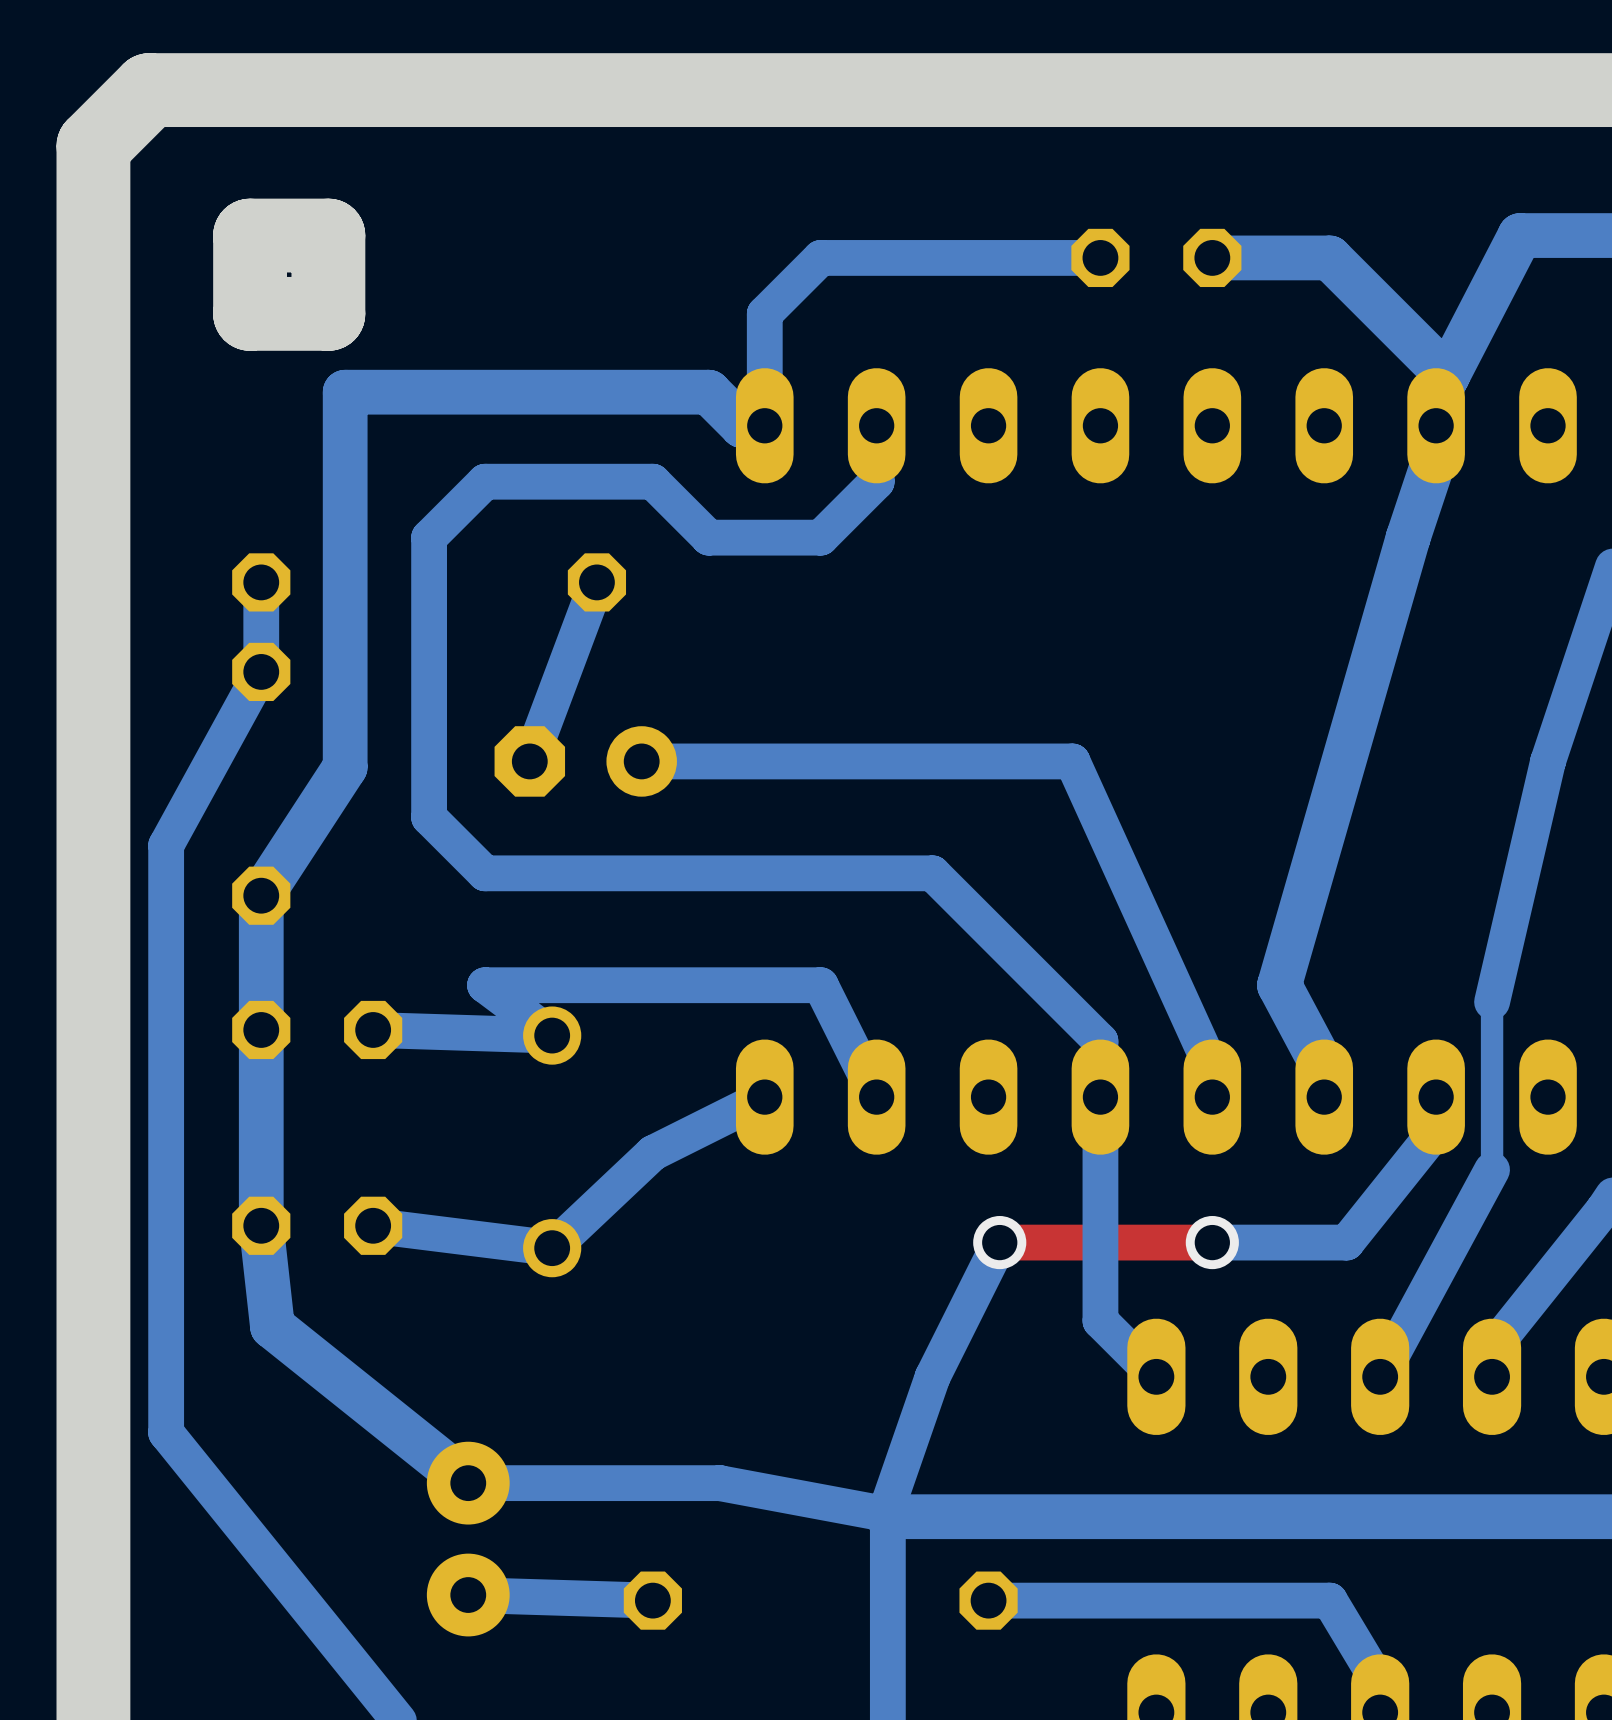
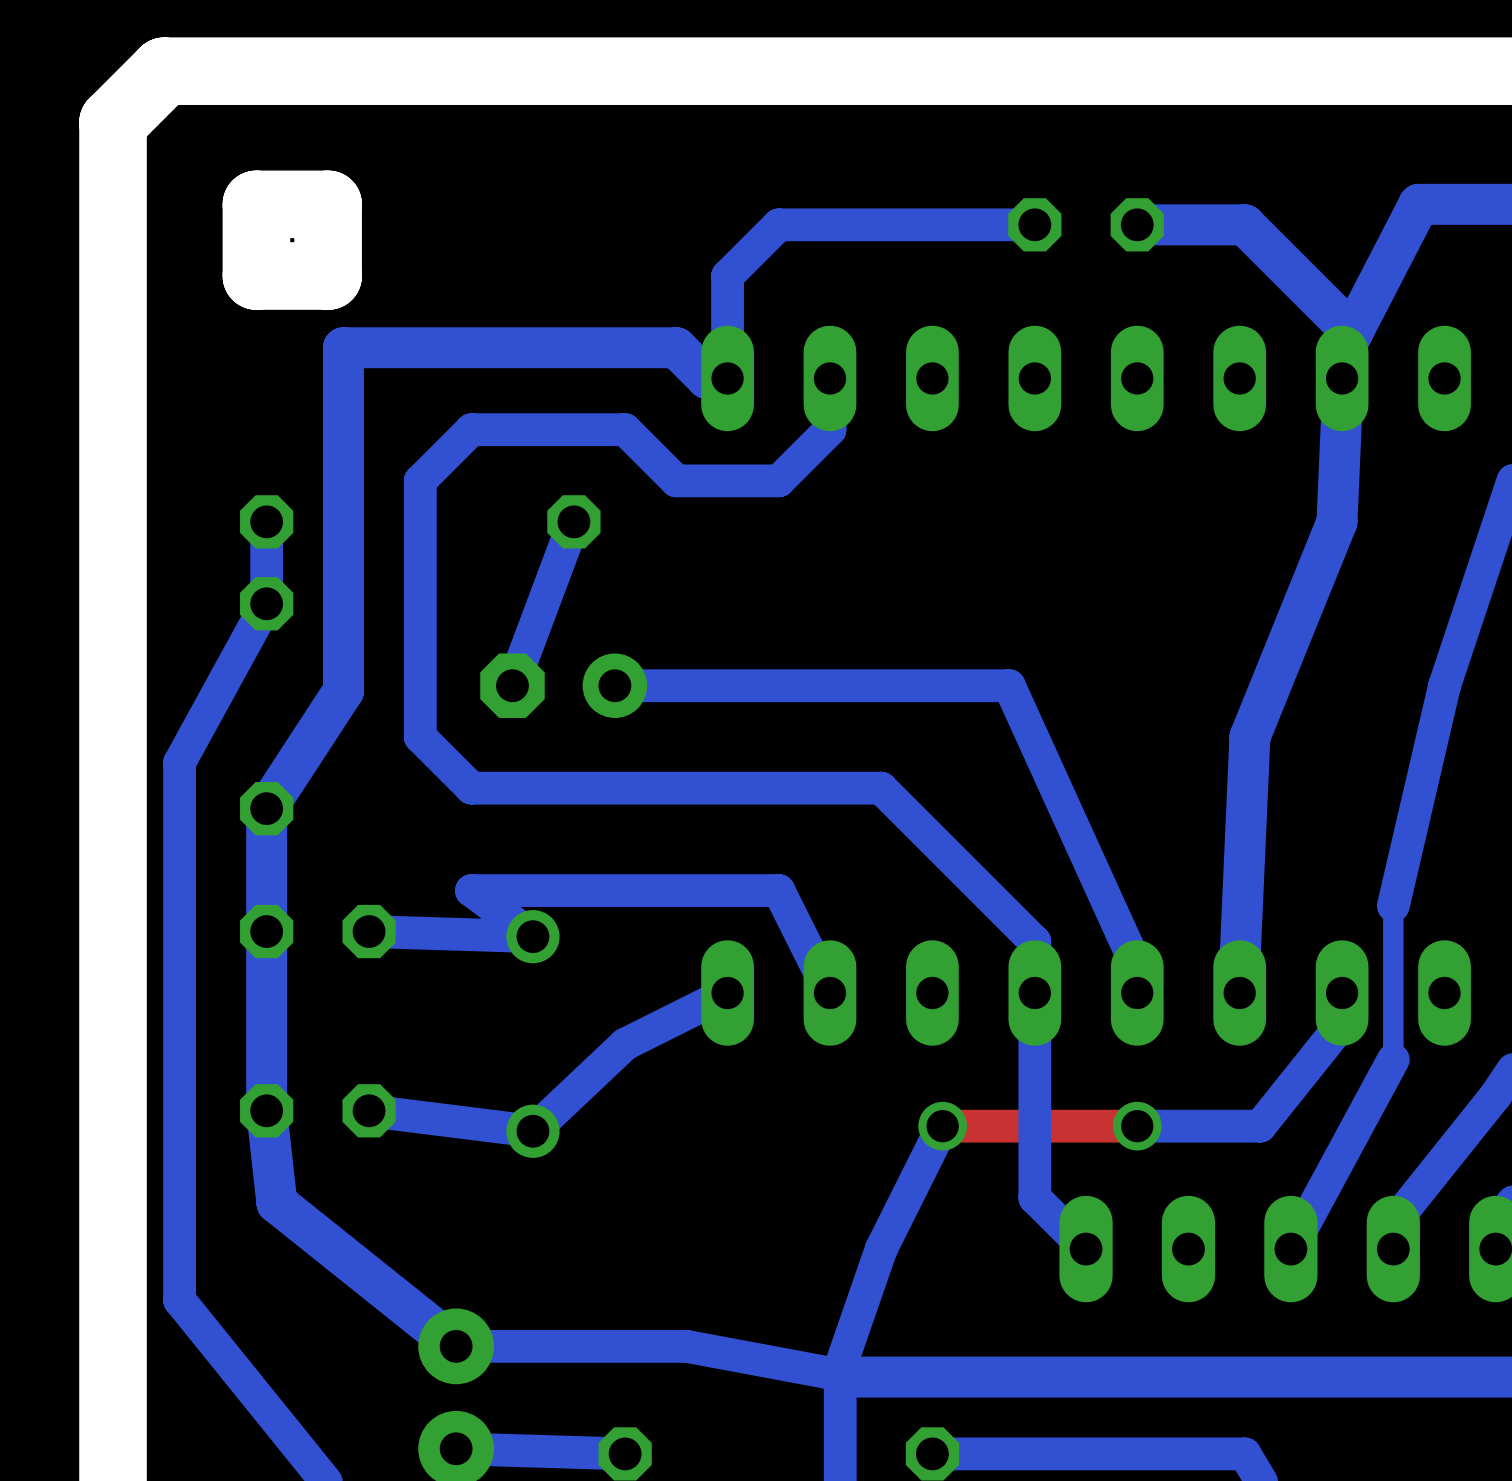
bottom track: (1436, 453) (1408, 537) (1279, 985) (1324, 1069) -> (1342, 404) (1336, 521) (1249, 736) (1239, 967)

